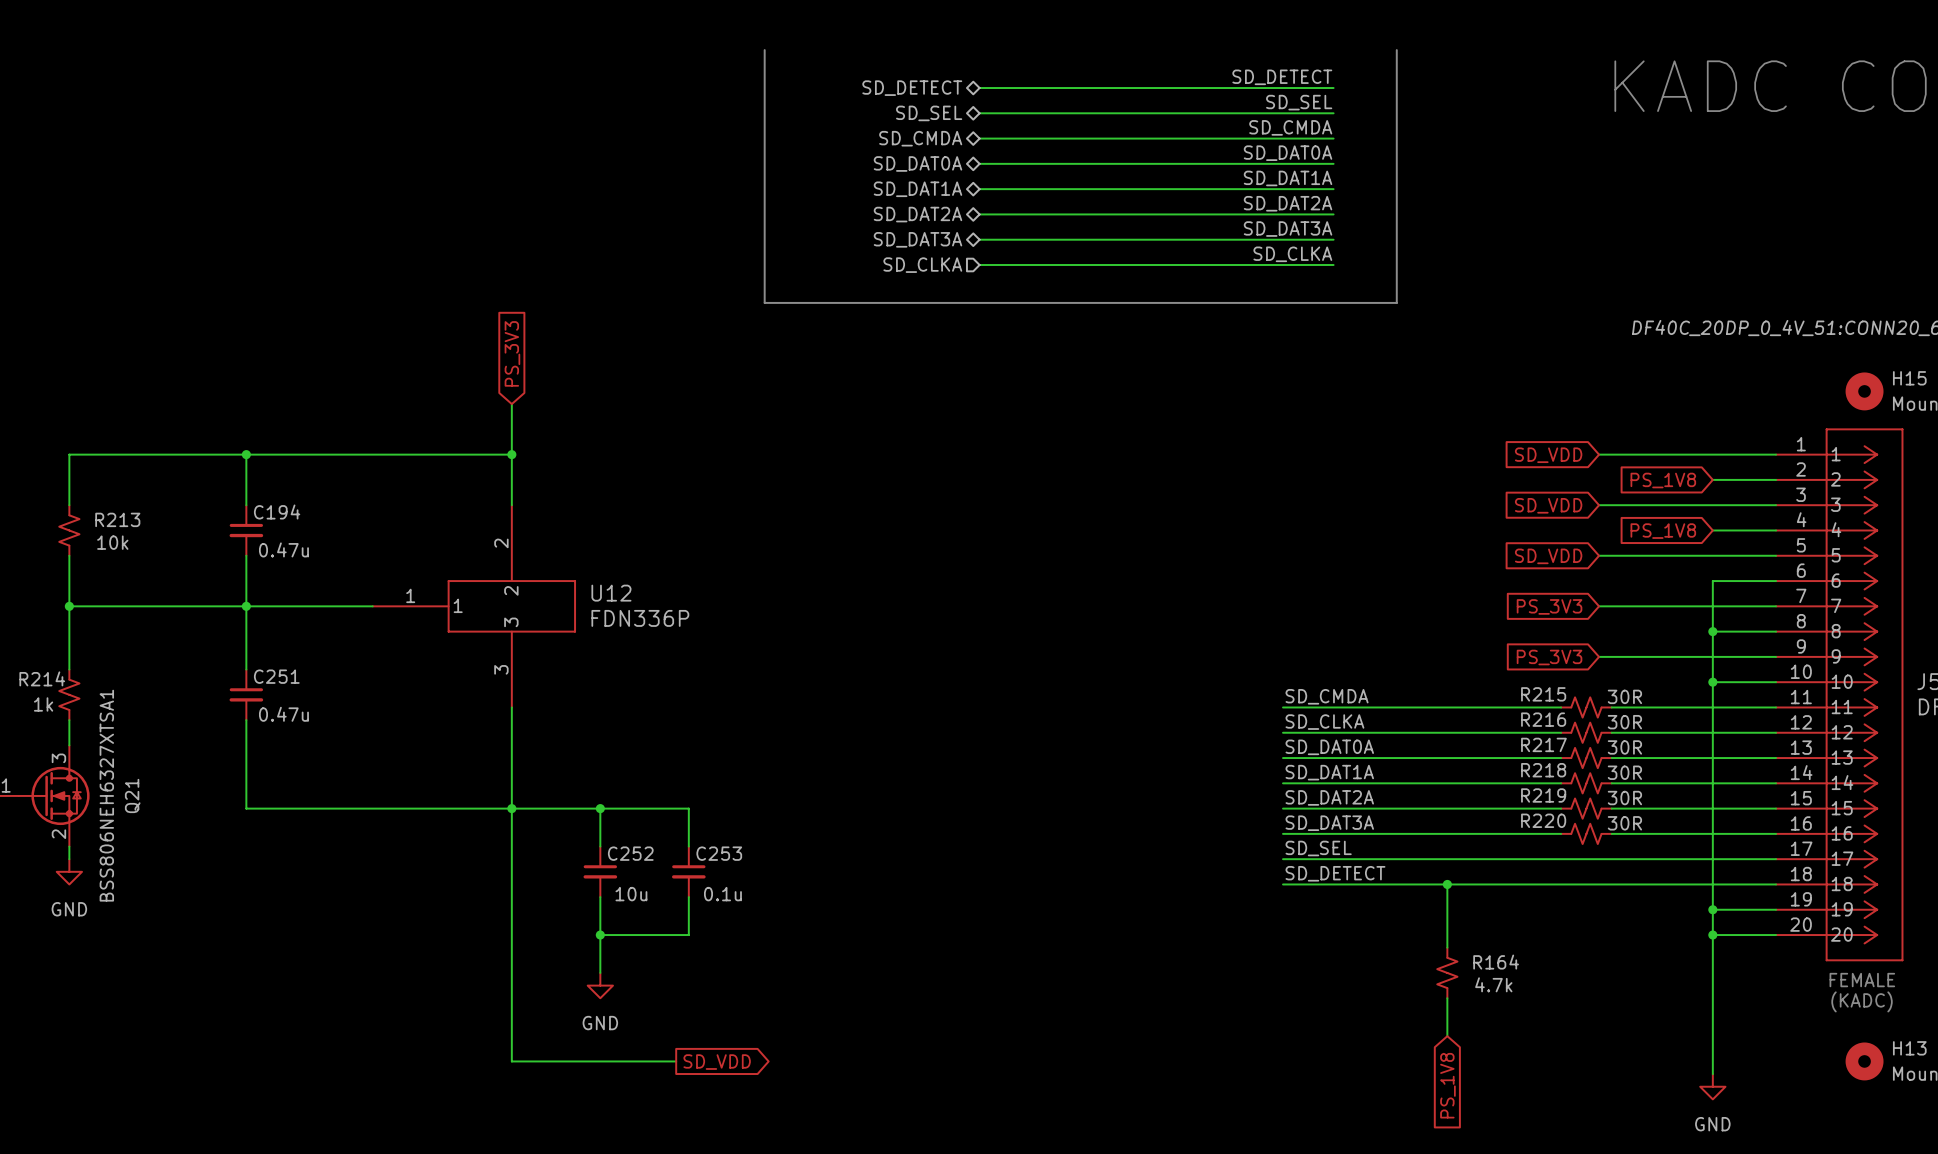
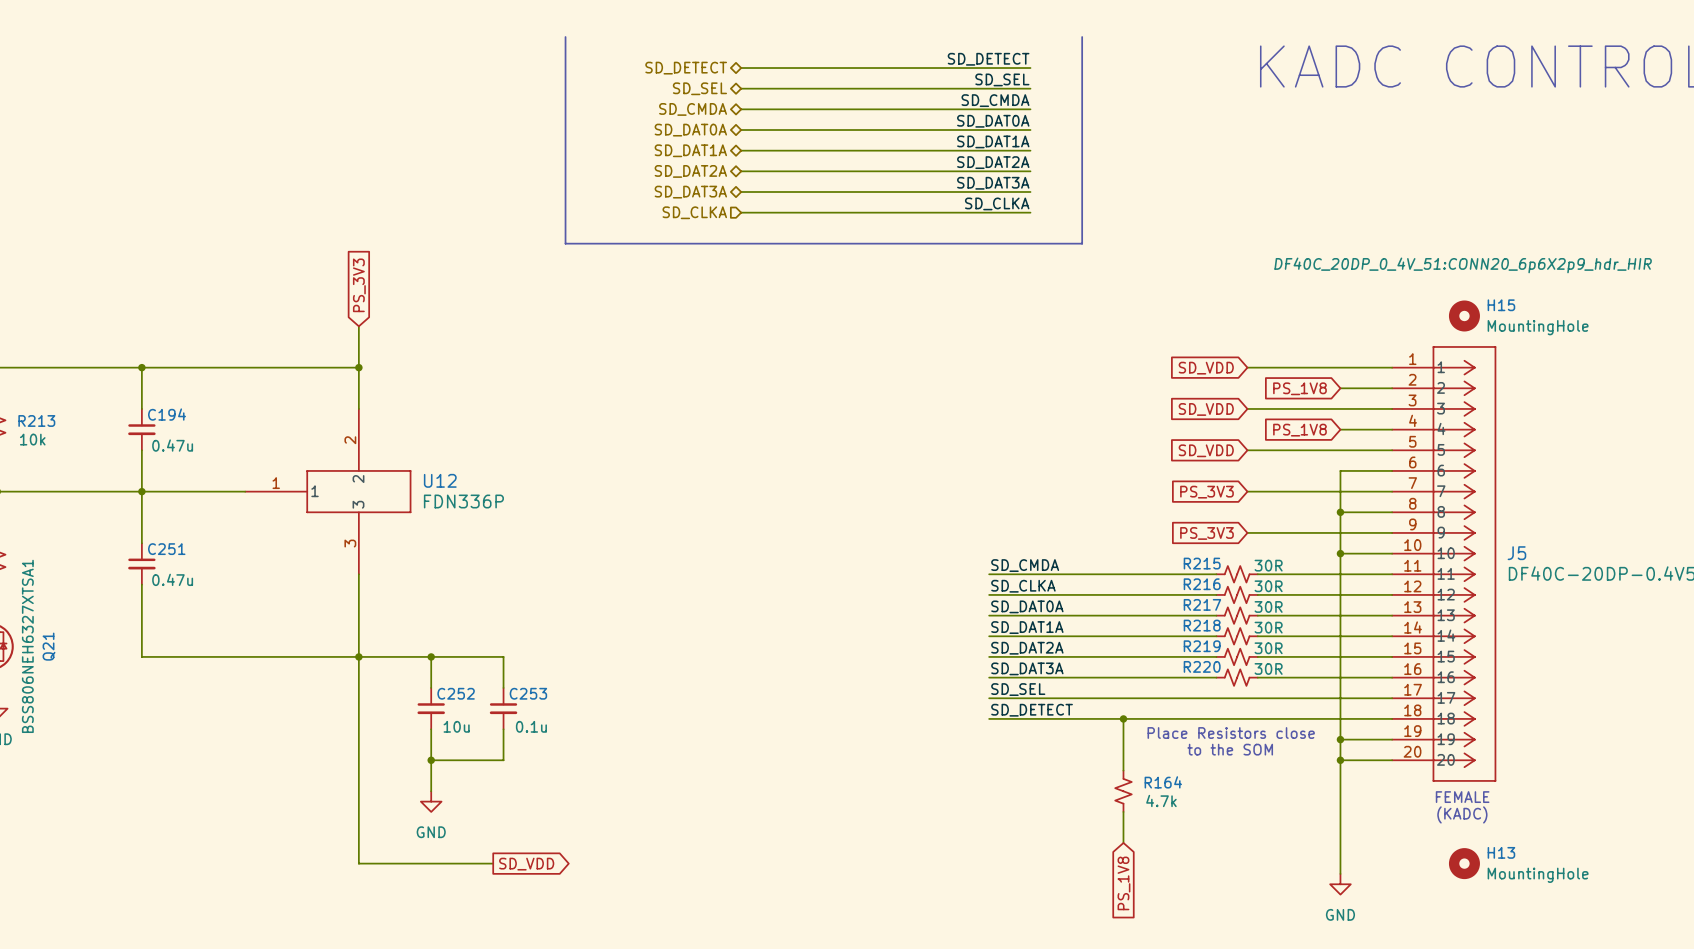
text: none -> Place Resistors close (1231, 733)
text: none -> to the SOM (1230, 749)

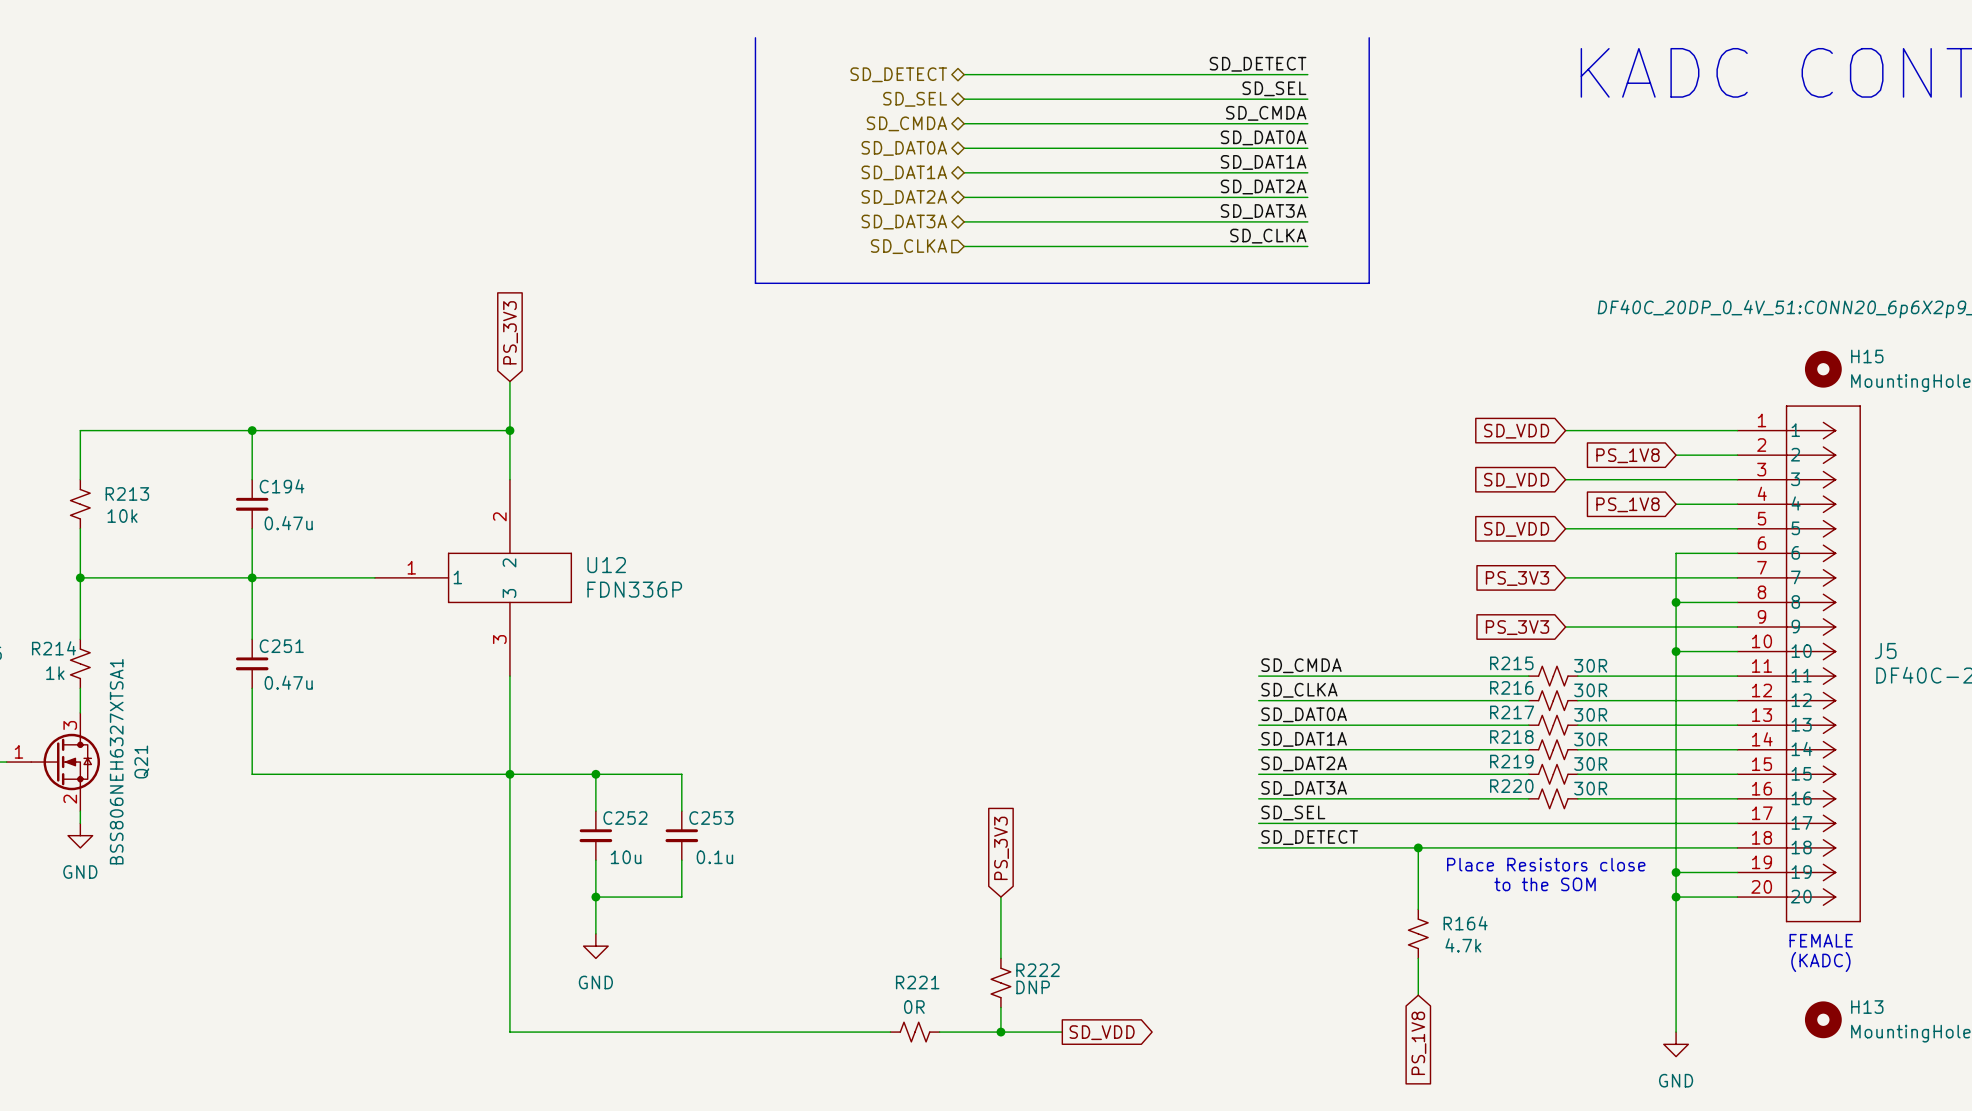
global label: none -> PS_3V3 (1001, 848)
wire: none -> (1000, 897) (1000, 958)
R222: none -> DNP (1000, 982)
wire: none -> (1000, 1007) (1000, 1032)
wire: (358, 863) (493, 863) -> (509, 1019) (509, 1032) (890, 1032)
global label: SD_VDD (526, 864) -> none
R221: none -> 0R (915, 1032)
wire: none -> (939, 1032) (1062, 1032)
junction: none -> (1000, 1032)
global label: none -> SD_VDD (1102, 1032)

